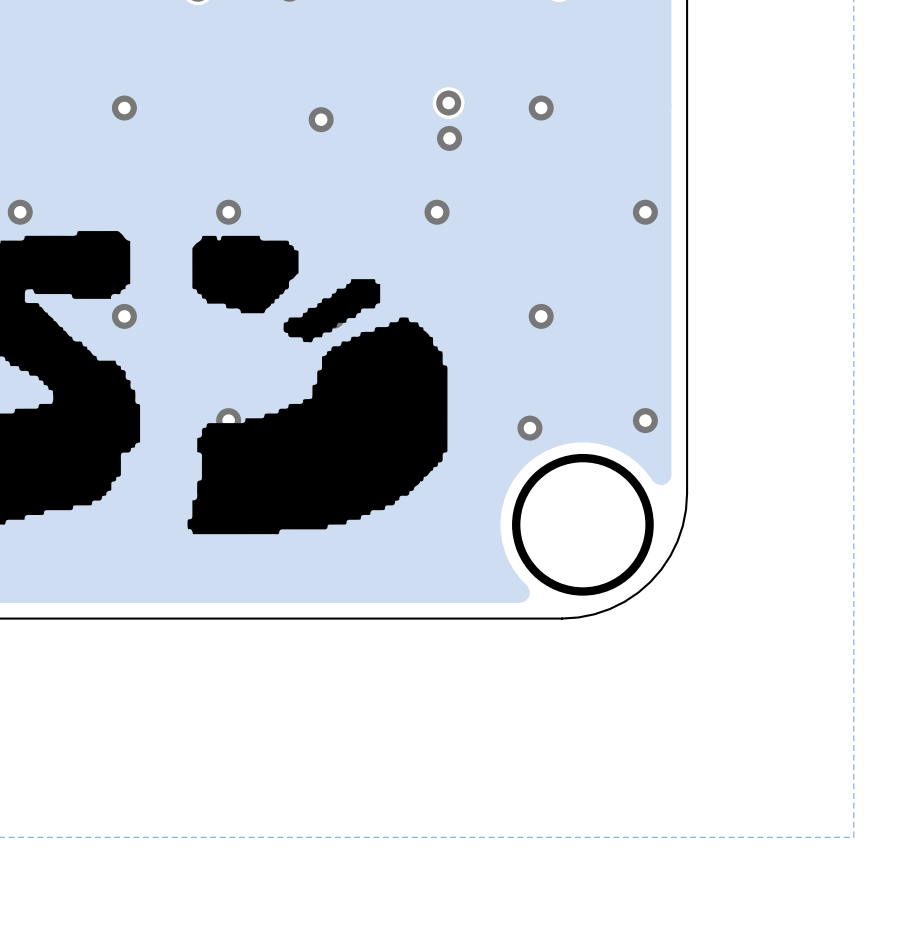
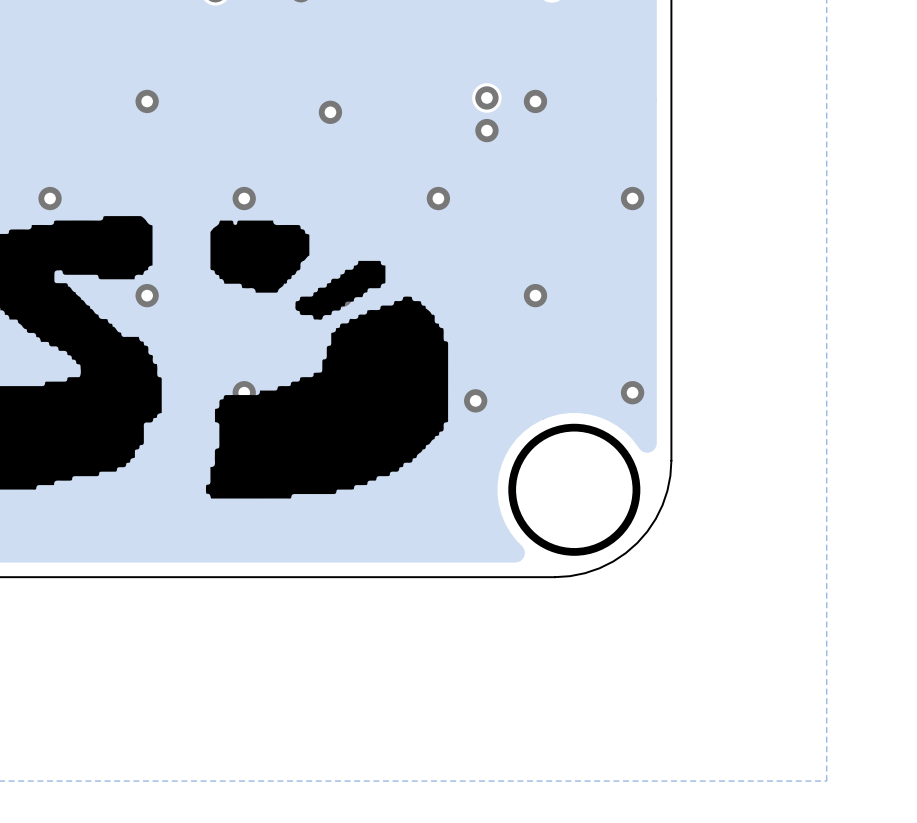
via: (448, 103) -> none
via: none -> (486, 97)
via: (449, 138) -> none
via: none -> (486, 130)
via position: (529, 428) -> (475, 400)

